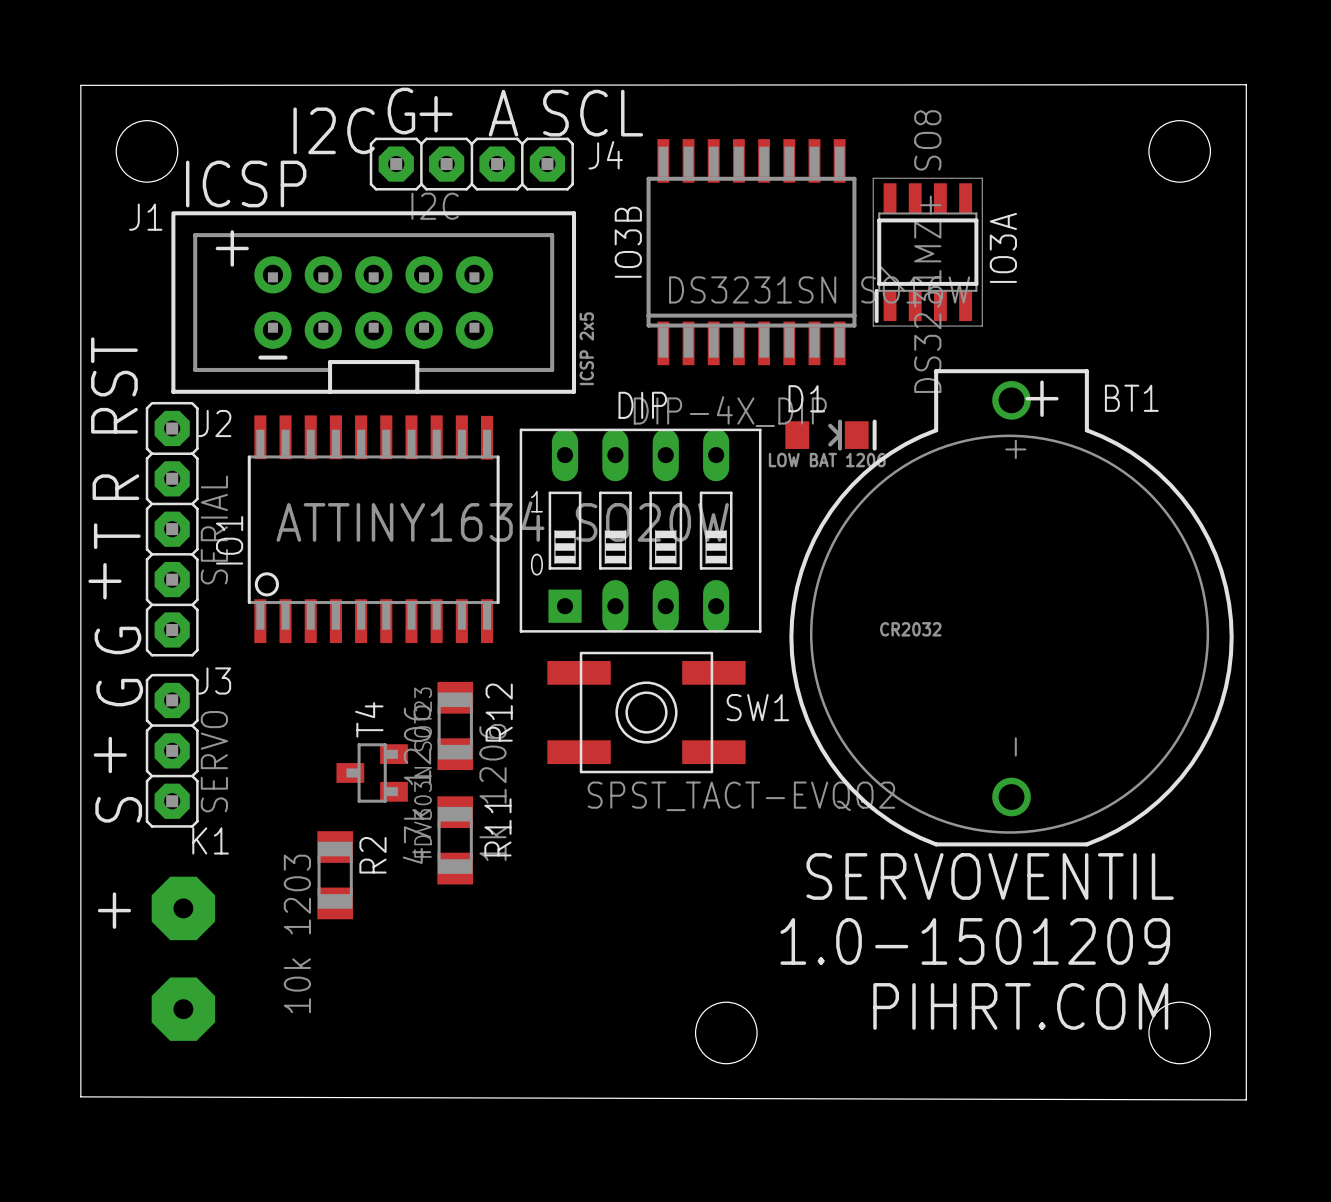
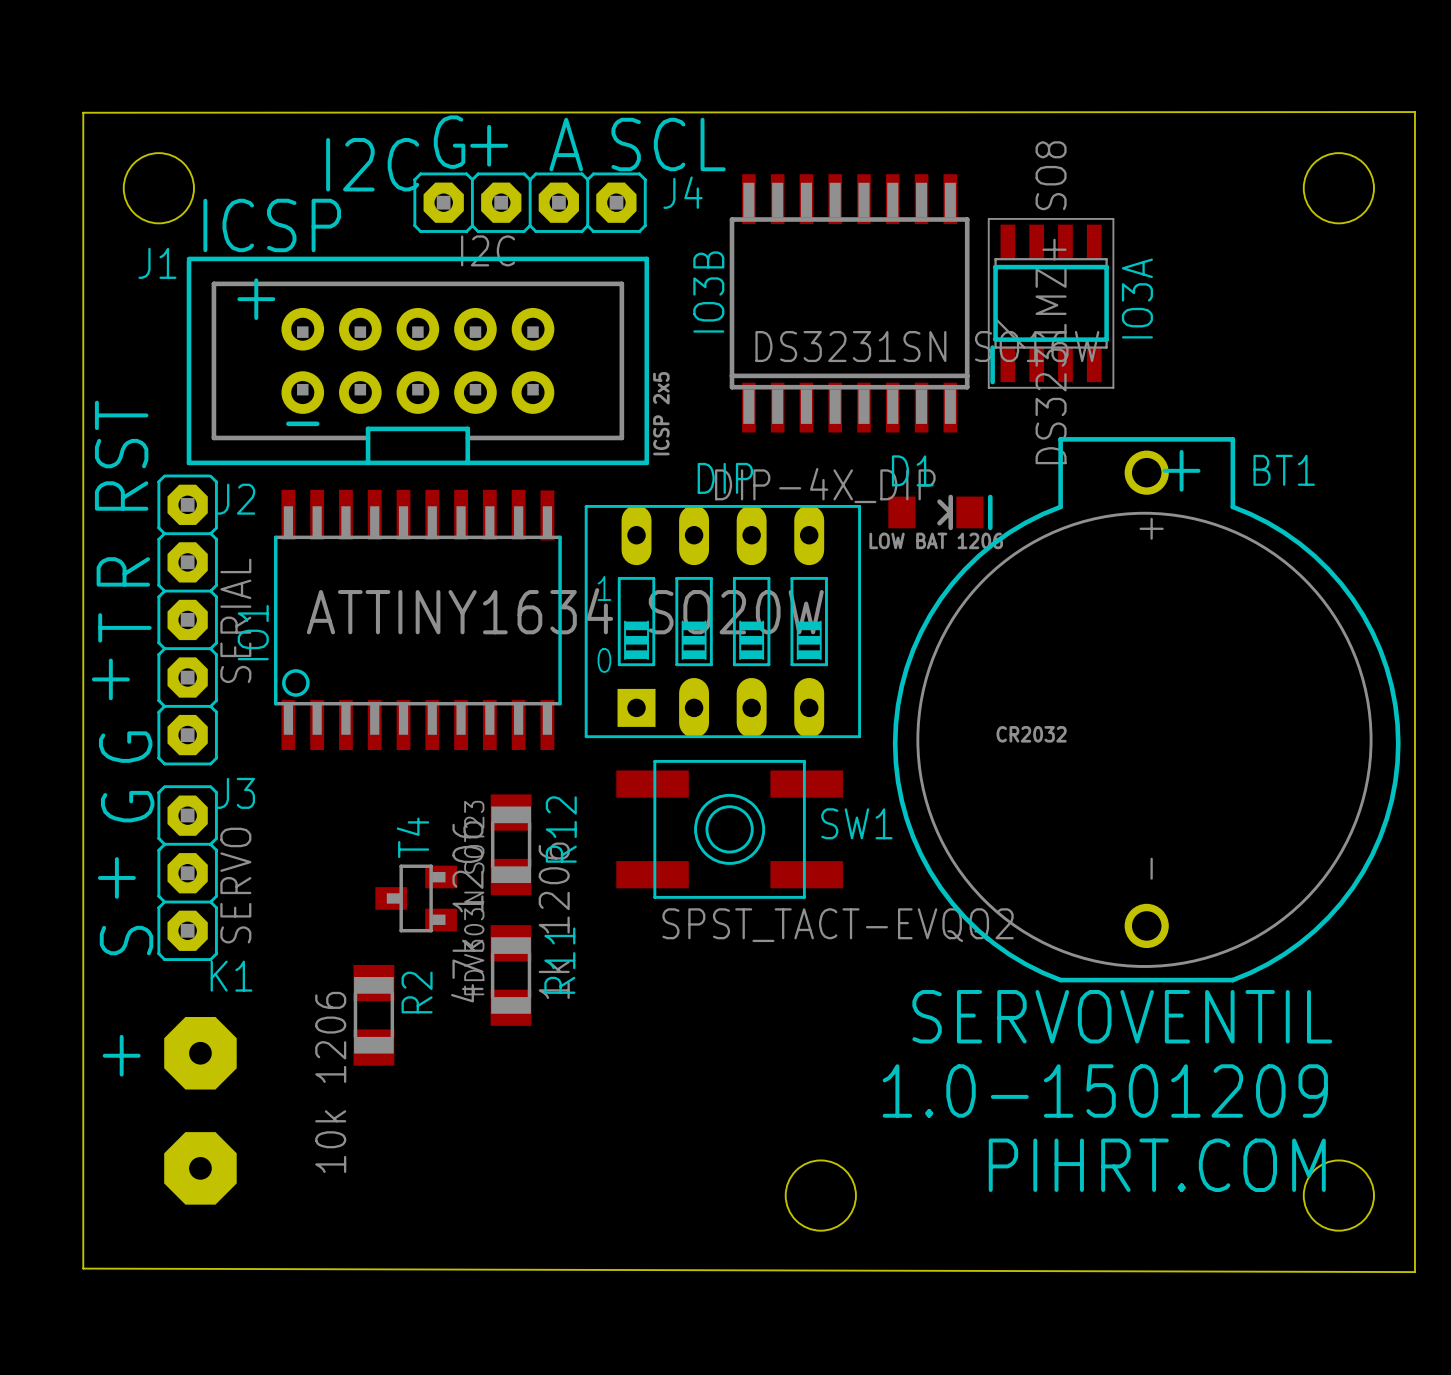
R2 value: 10k 1203 (297, 933) -> 10k 1206 (330, 1082)

